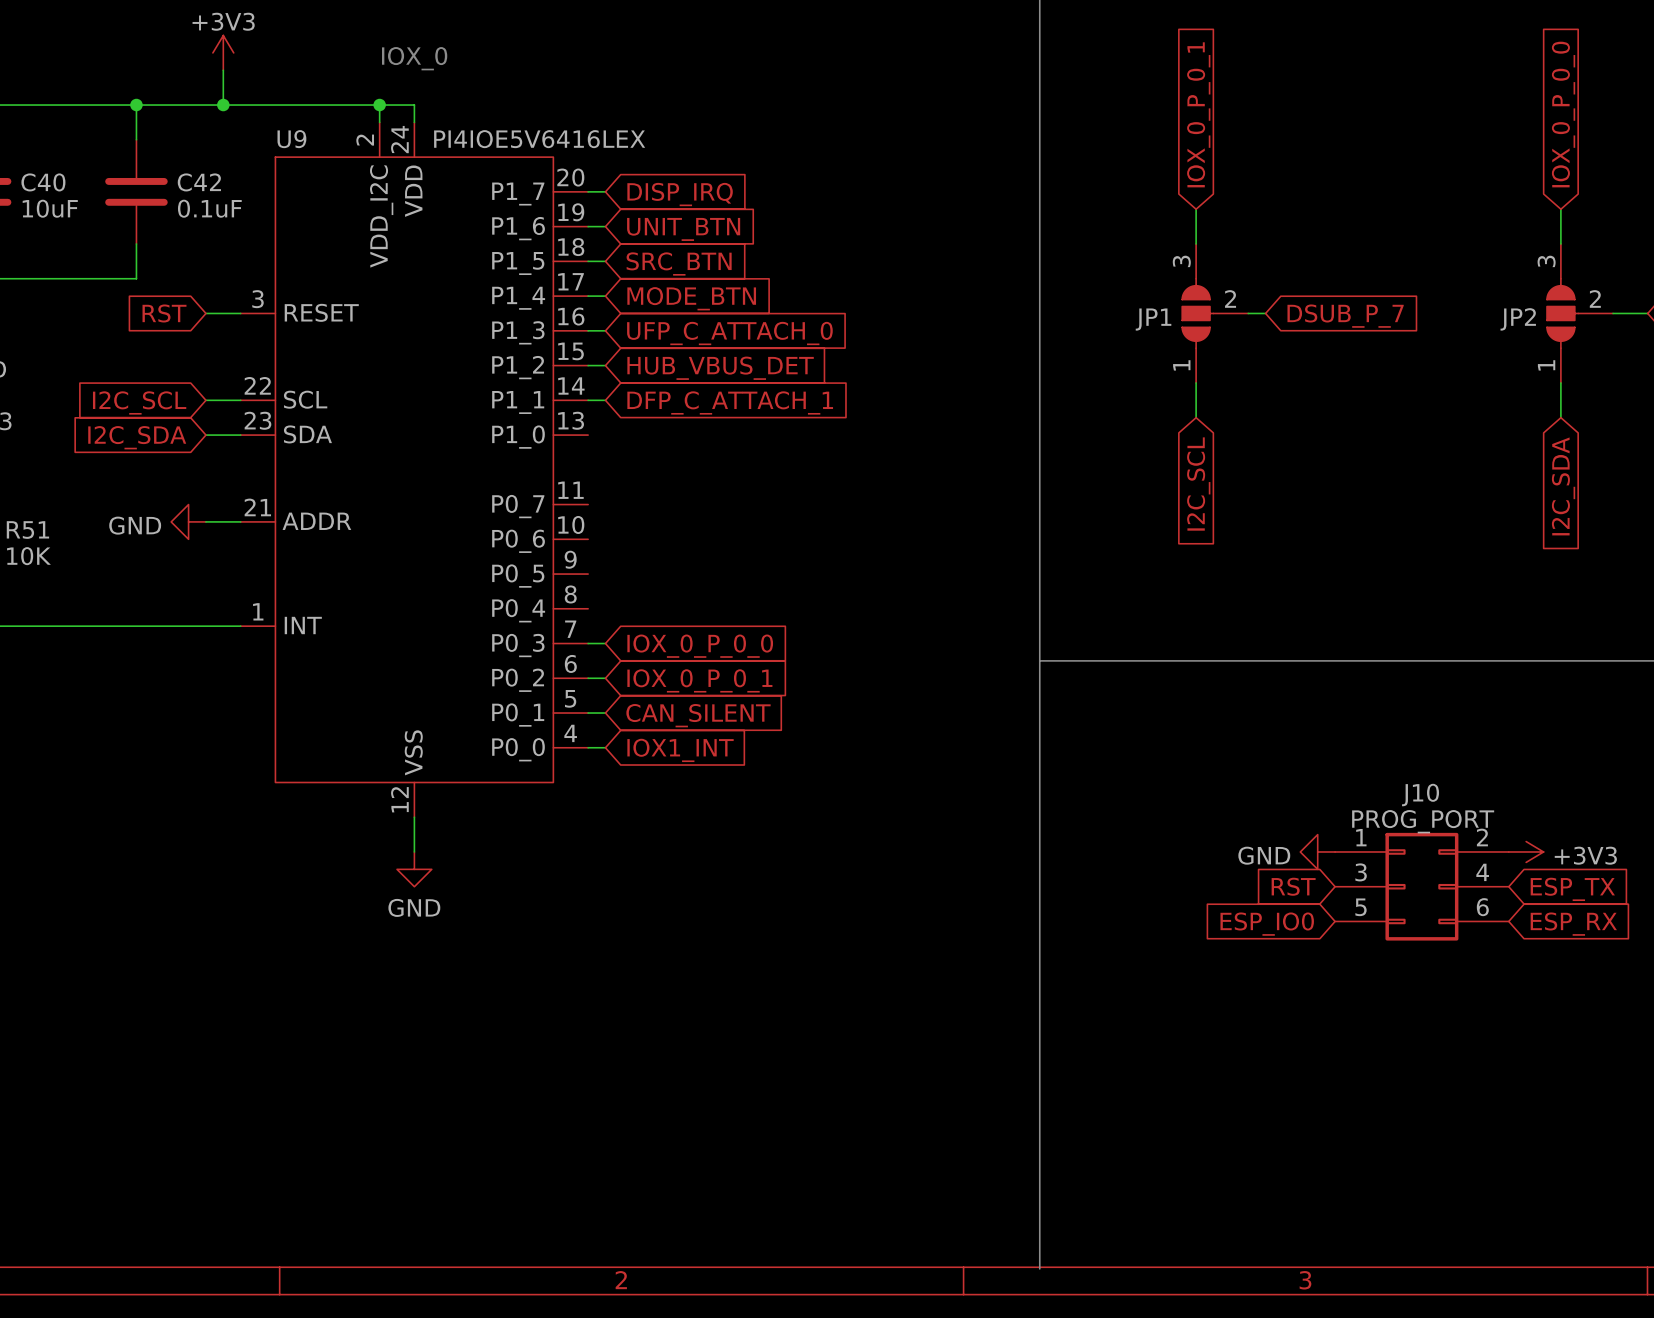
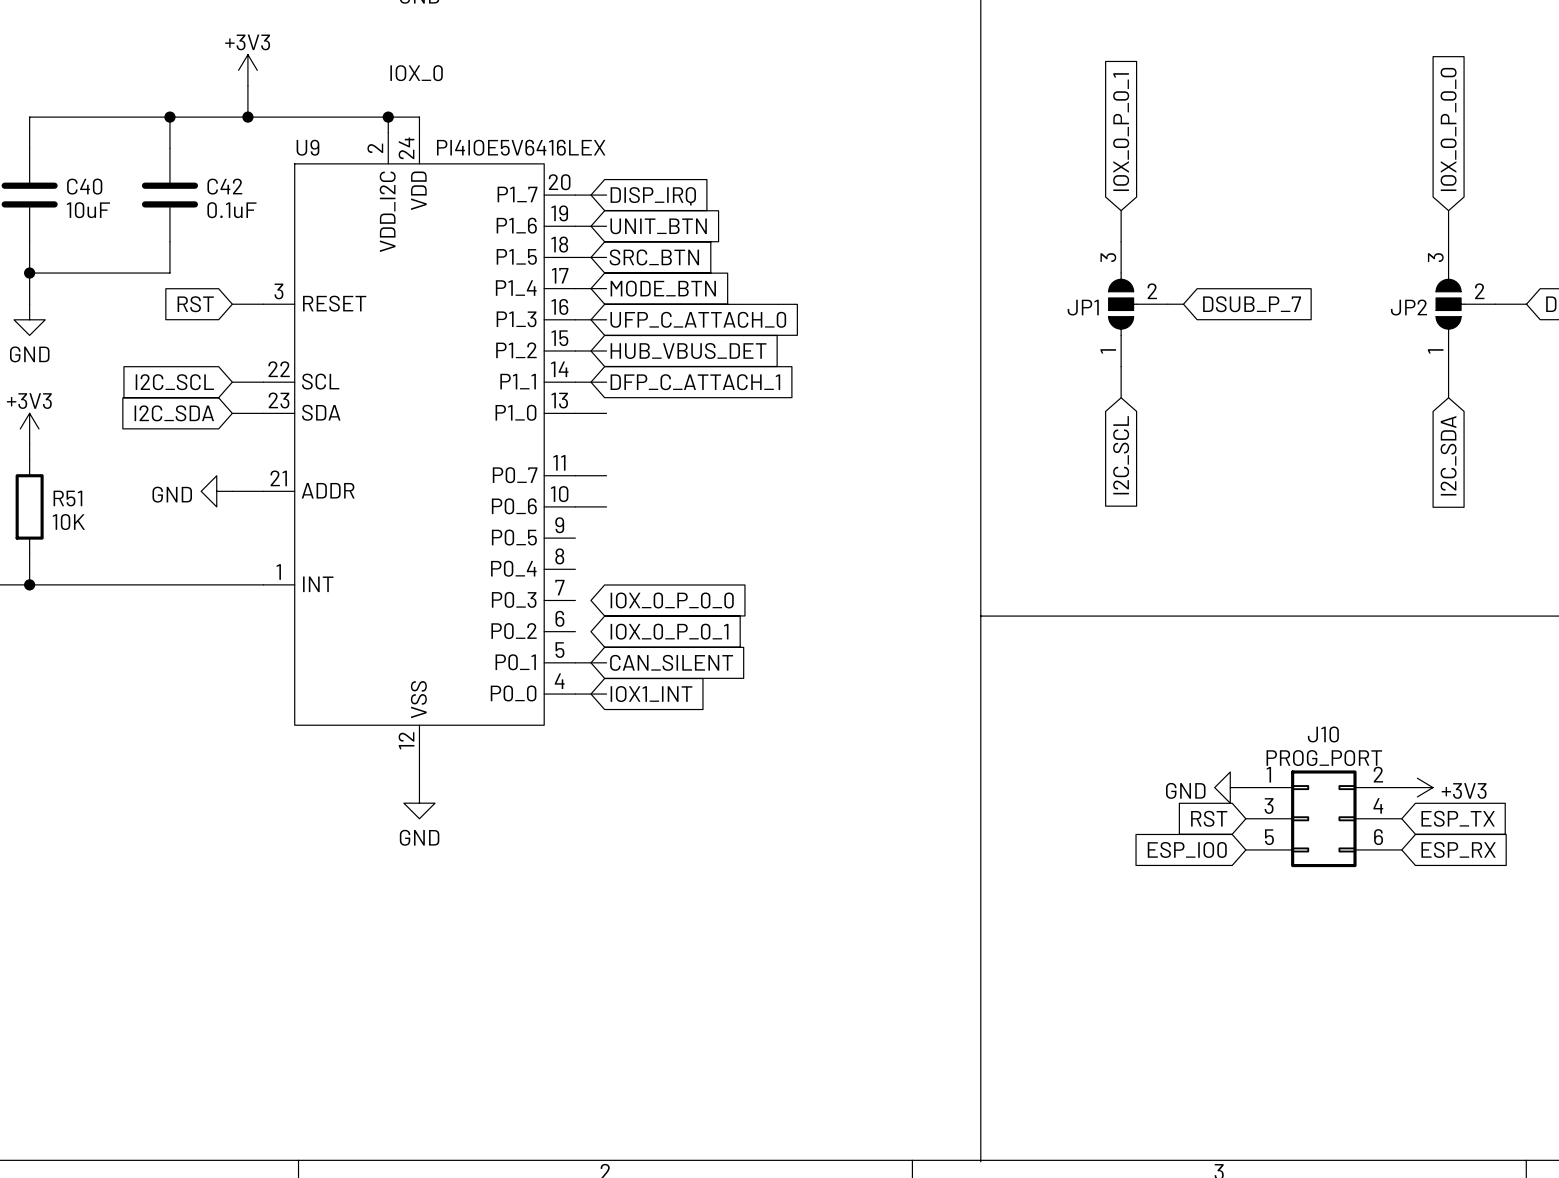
wire: none -> (590, 195) (606, 195)
wire: none -> (590, 226) (606, 226)
wire: none -> (590, 257) (606, 257)
wire: none -> (590, 288) (606, 288)
wire: none -> (590, 319) (606, 319)
wire: none -> (590, 350) (606, 350)
wire: none -> (590, 382) (606, 382)
wire: none -> (575, 413) (606, 413)
wire: none -> (575, 475) (606, 475)
wire: none -> (575, 506) (606, 506)
wire: (588, 643) (605, 643) -> (590, 662) (606, 662)
wire: (588, 678) (605, 678) -> (590, 694) (606, 694)

